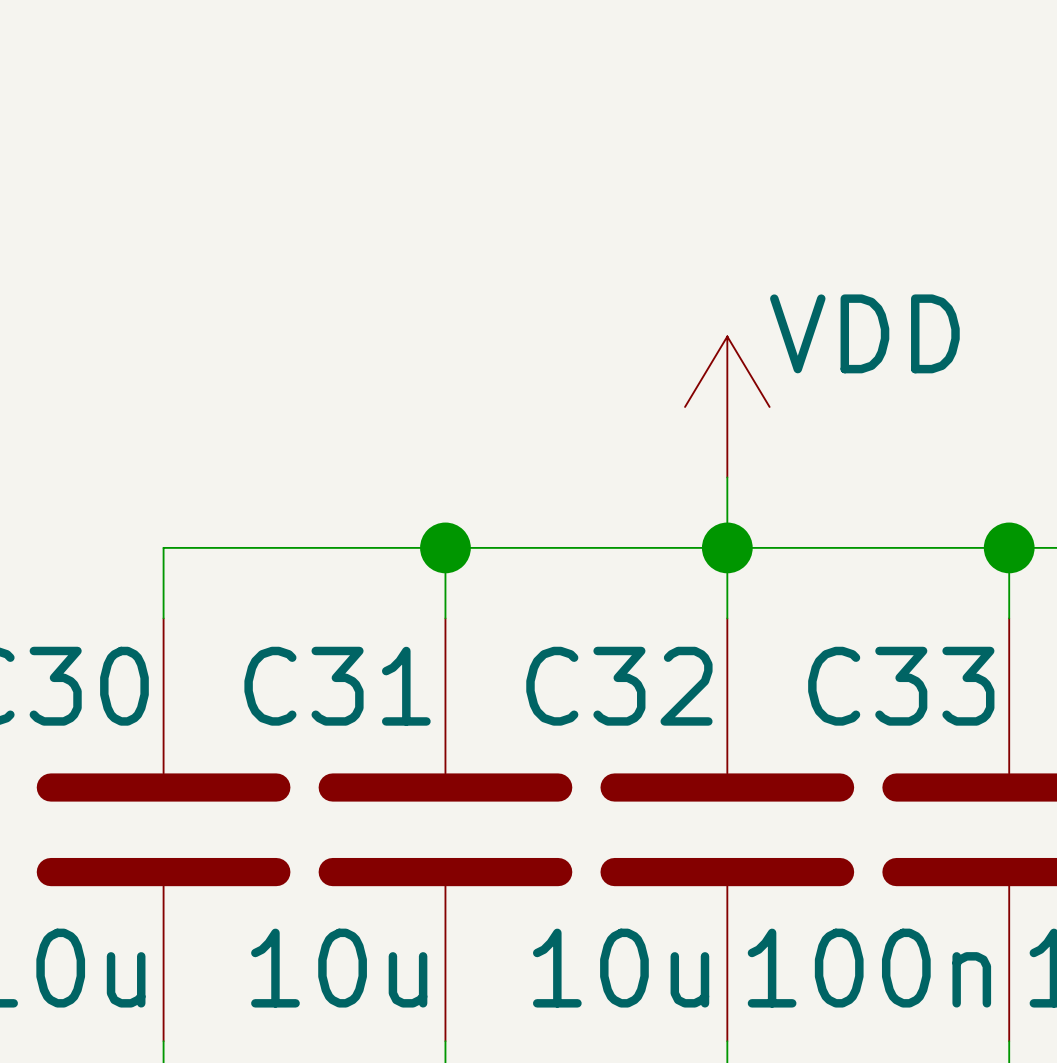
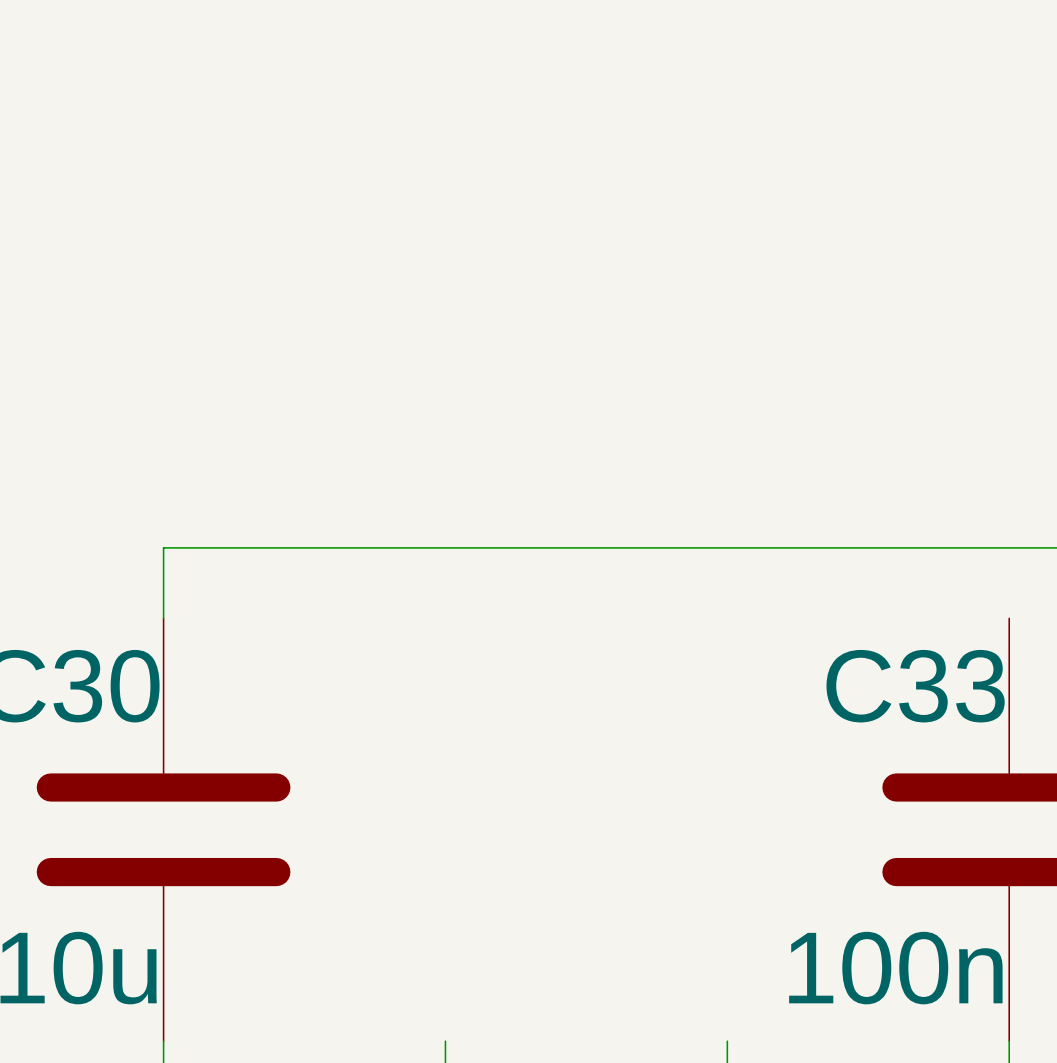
power symbol: VDD (727, 406) -> none
wire: (727, 477) (727, 618) -> none
wire: (445, 547) (445, 618) -> none
junction: (445, 547) -> none
junction: (727, 547) -> none
wire: (1009, 547) (1009, 618) -> none
junction: (1009, 547) -> none
C31: 10u (445, 829) -> none
C32: 10u (727, 829) -> none

